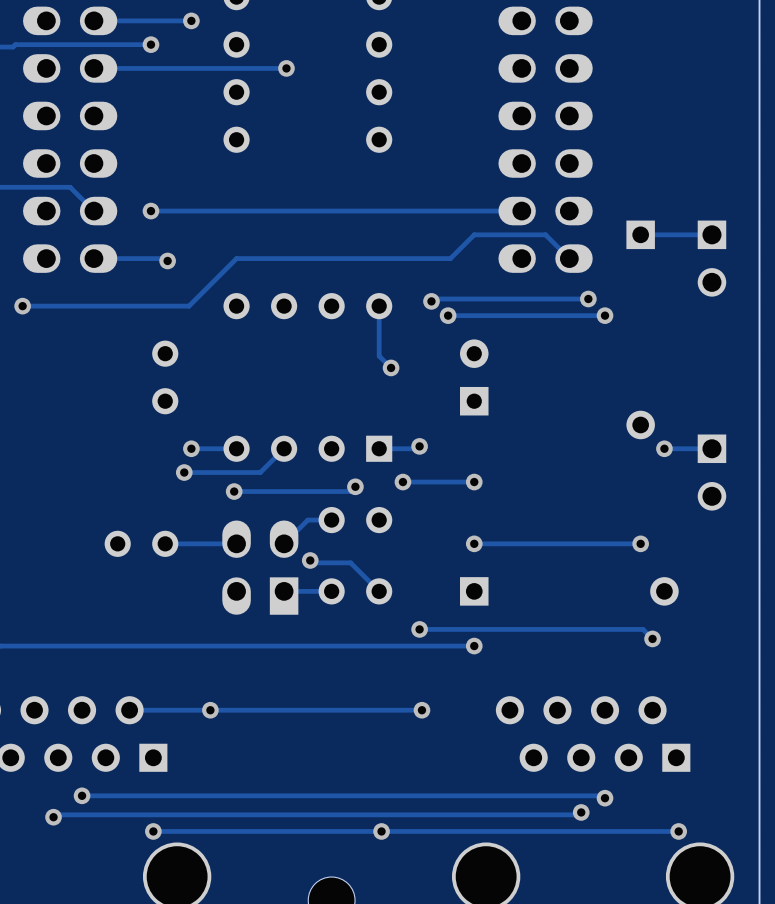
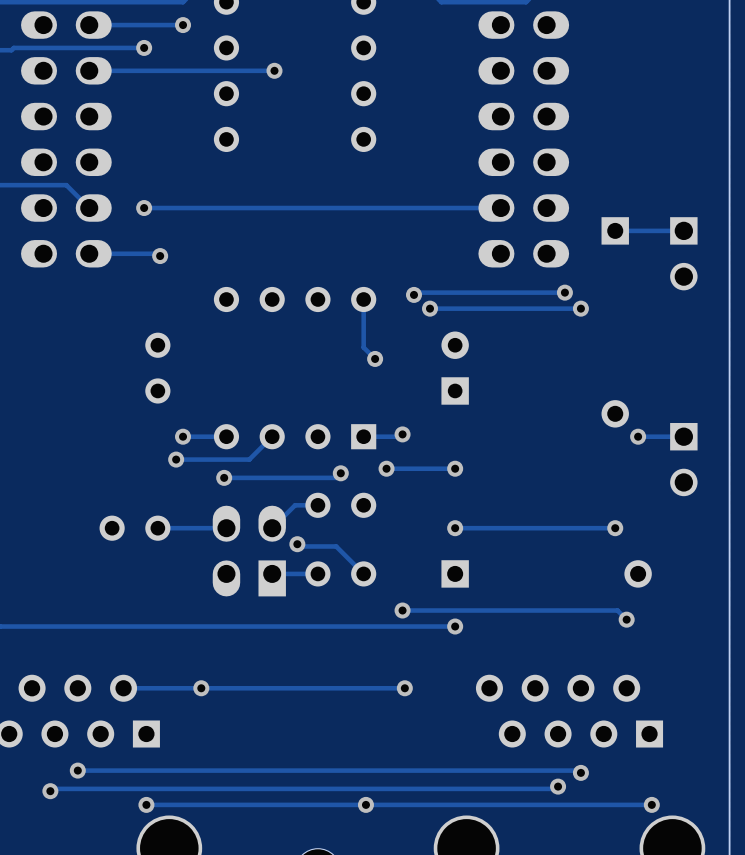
track: (569, 258) (545, 234) (474, 234) (450, 258) (236, 258) (189, 306) (22, 306) -> none
via: (22, 306) -> none

